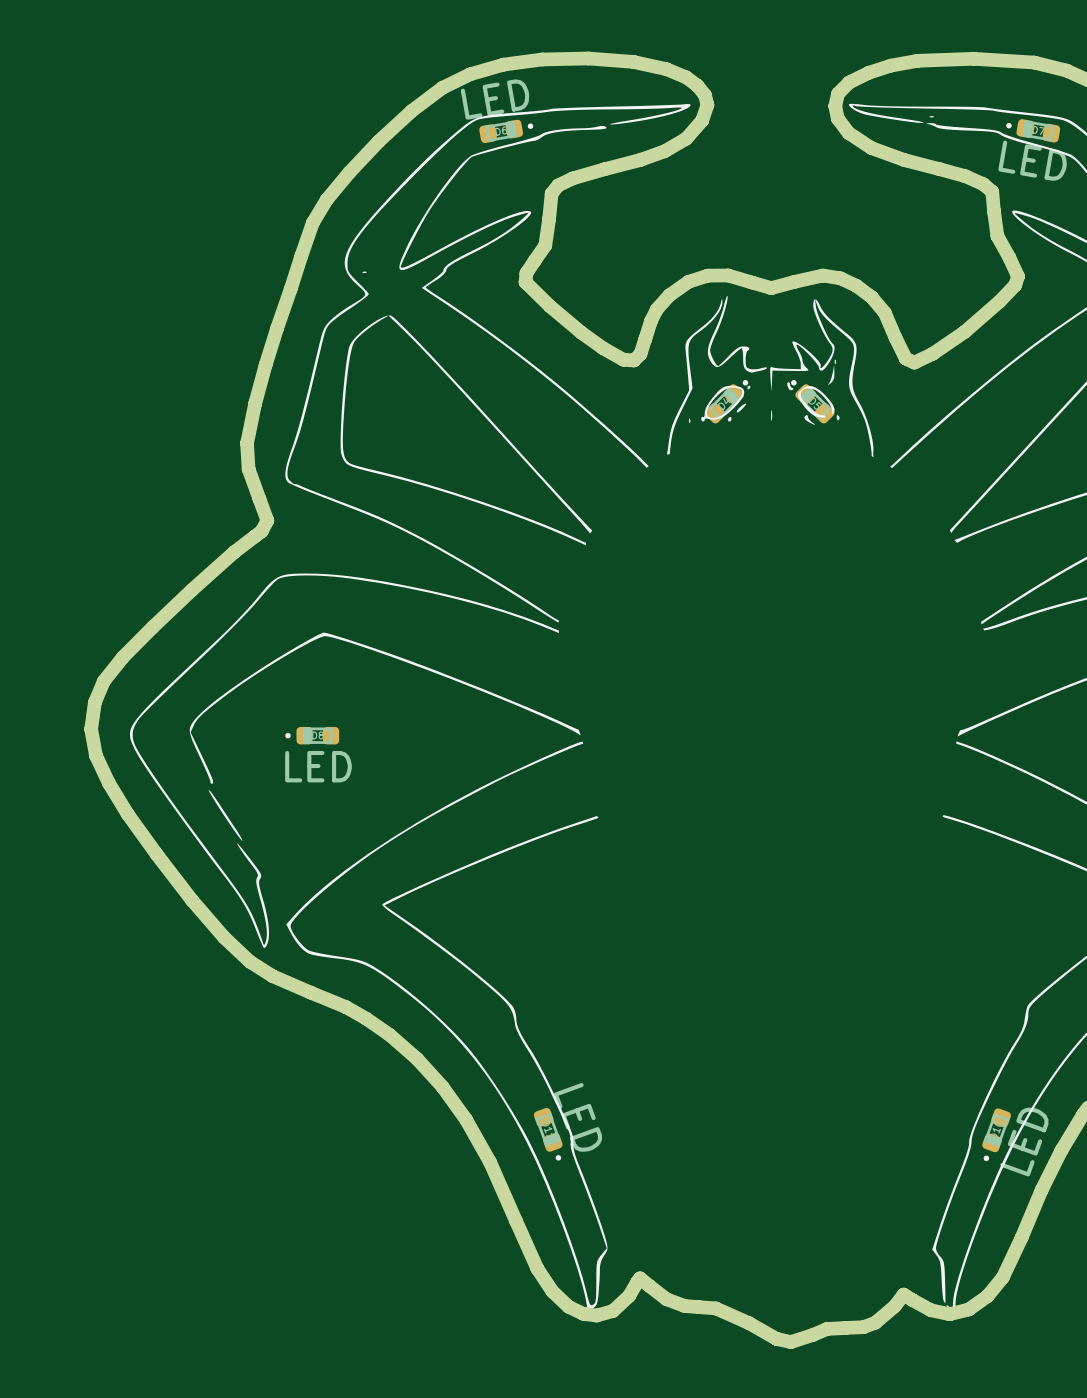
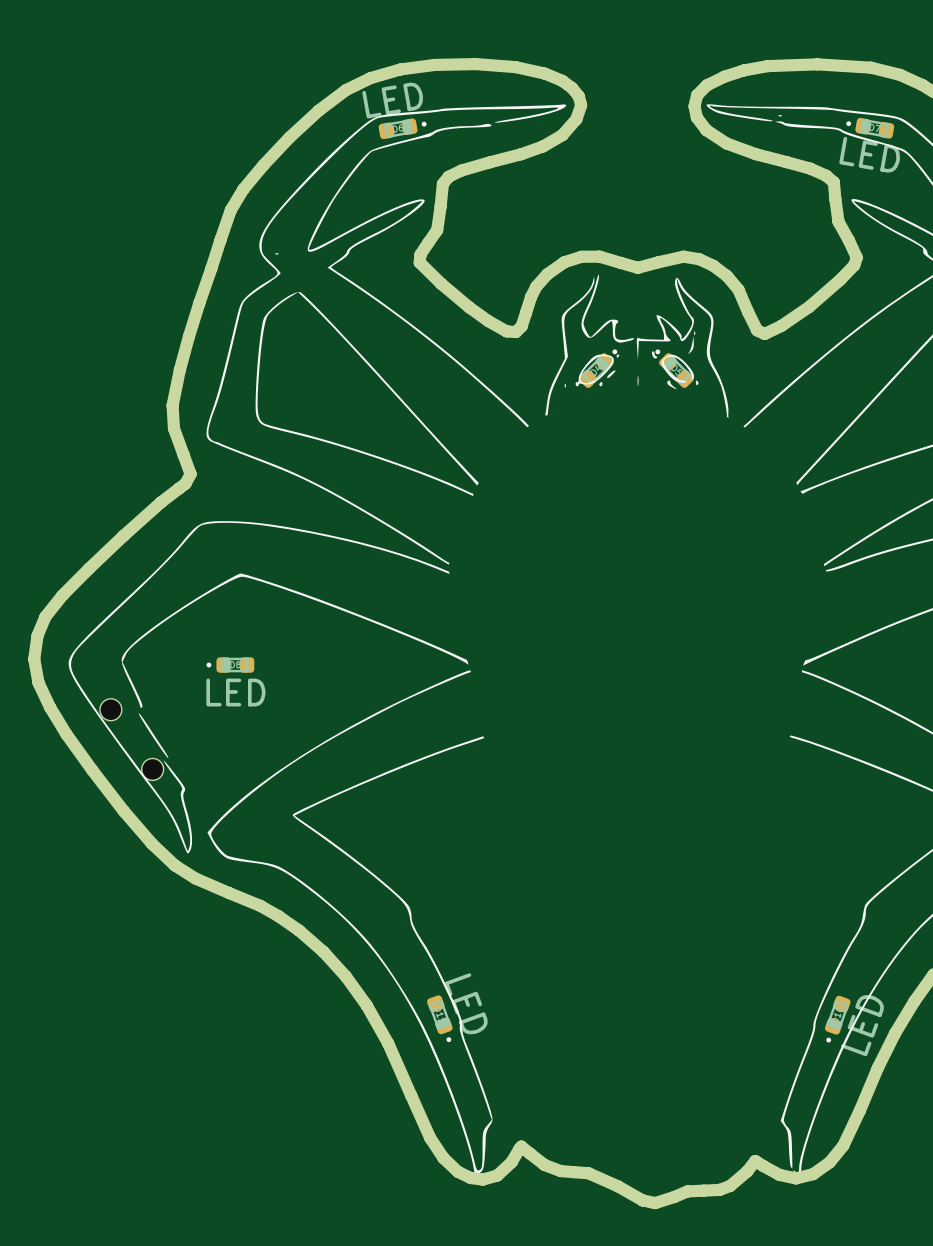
part: none -> (131, 739)

